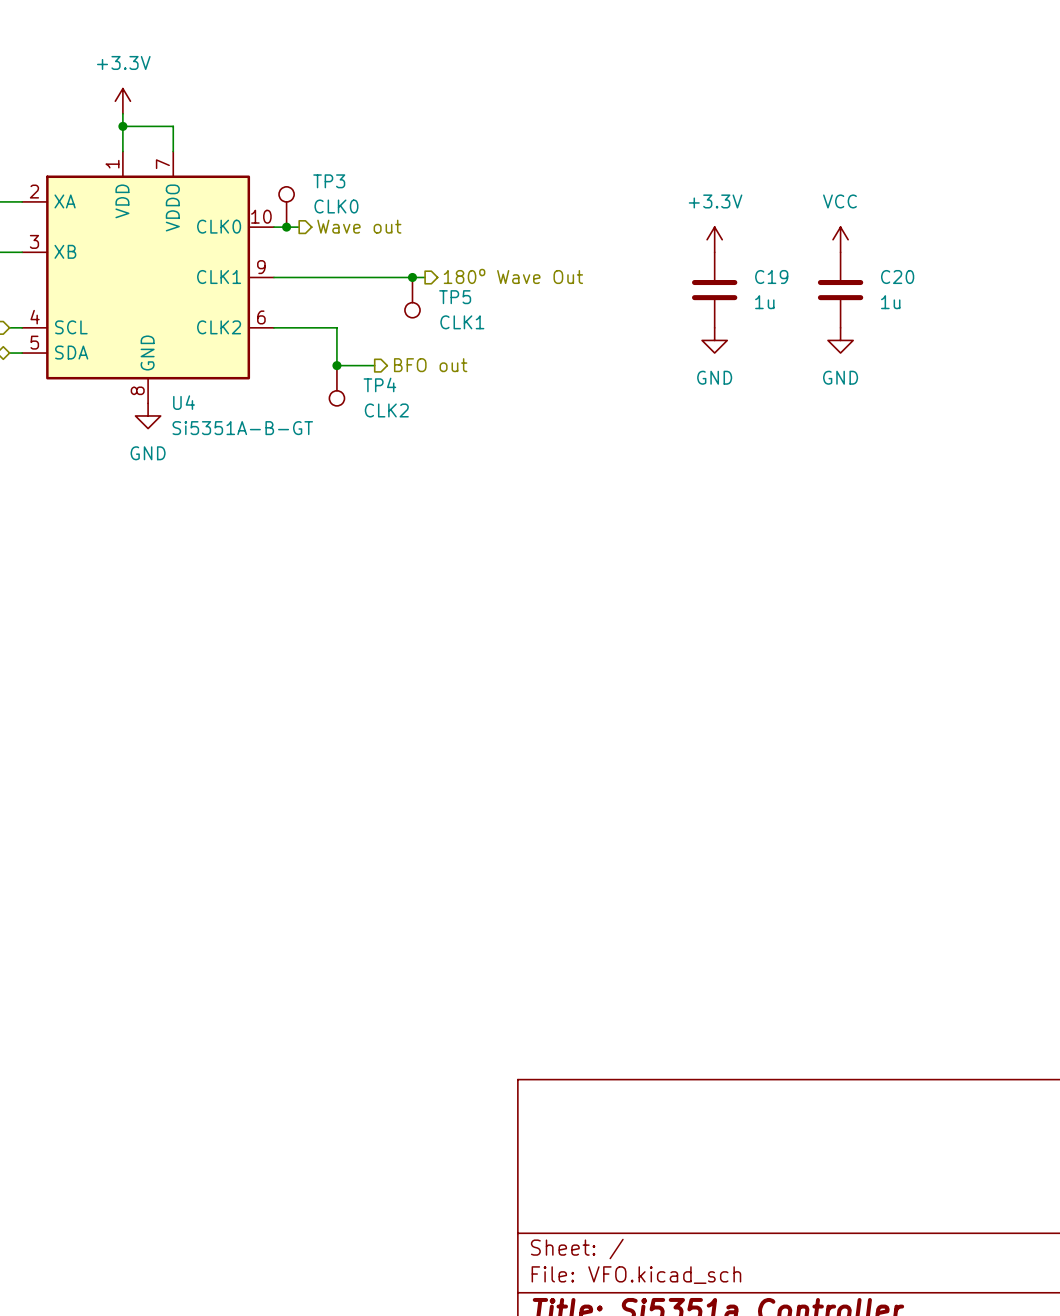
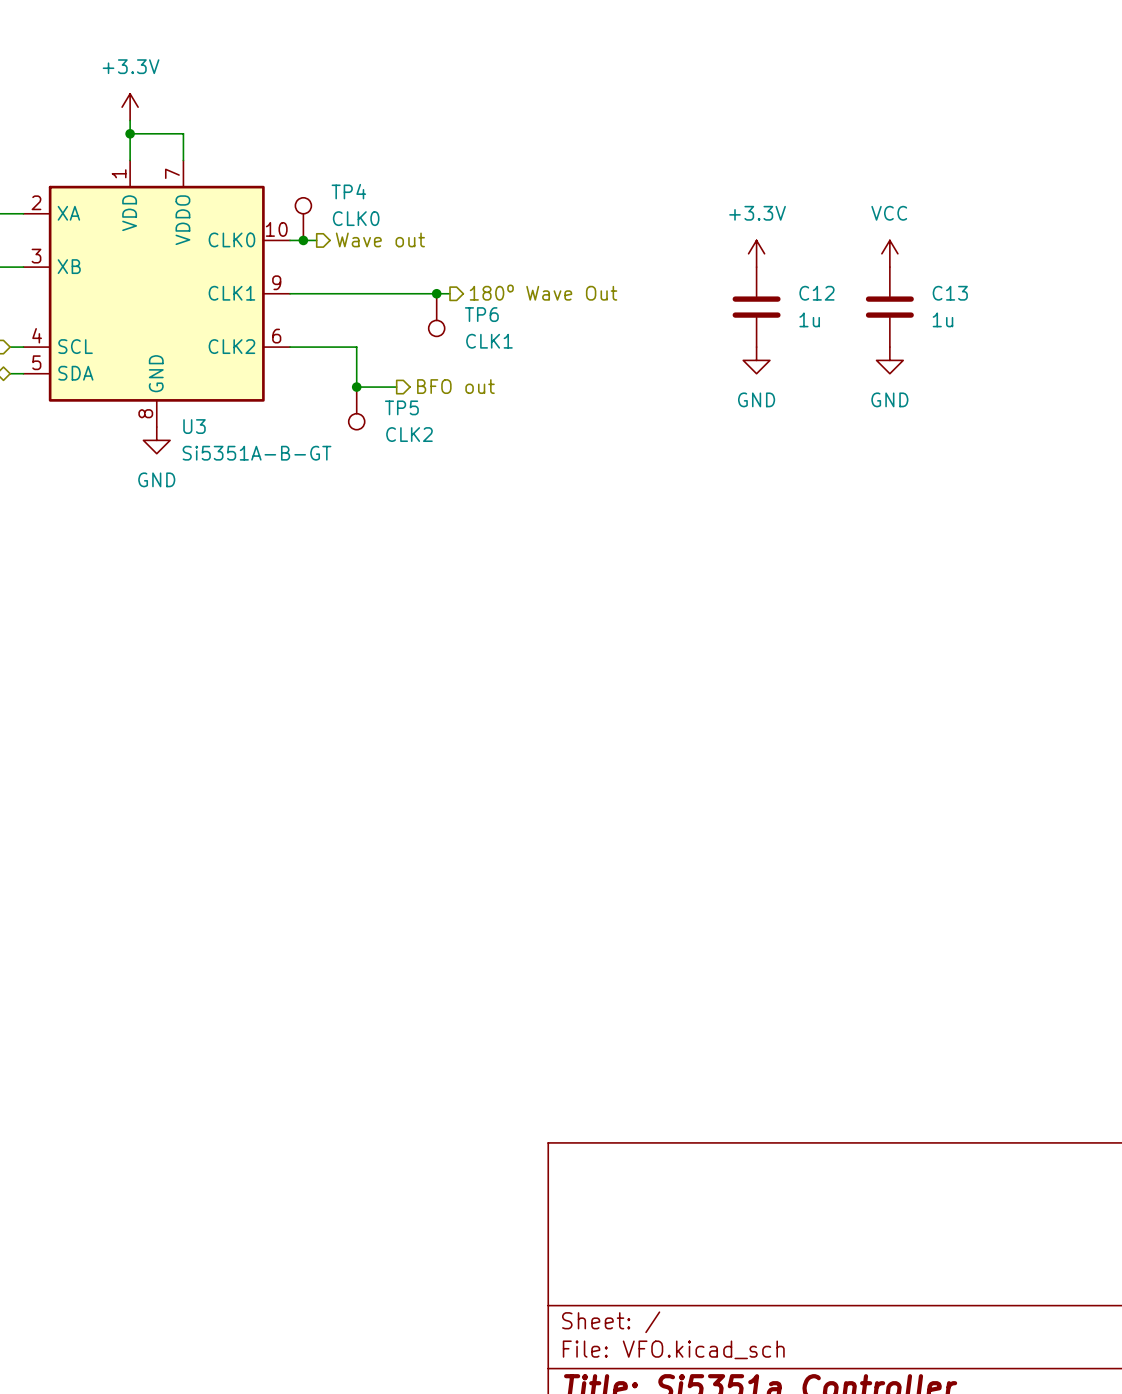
TP3 name: TP3 (329, 181) -> TP4 (348, 191)
C19 name: C19 (771, 277) -> C12 (816, 293)
C20 name: C20 (897, 277) -> C13 (950, 293)
TP5 name: TP5 (455, 297) -> TP6 (481, 314)
TP4 name: TP4 (379, 384) -> TP5 (401, 407)
U4 name: U4 (184, 402) -> U3 (194, 426)

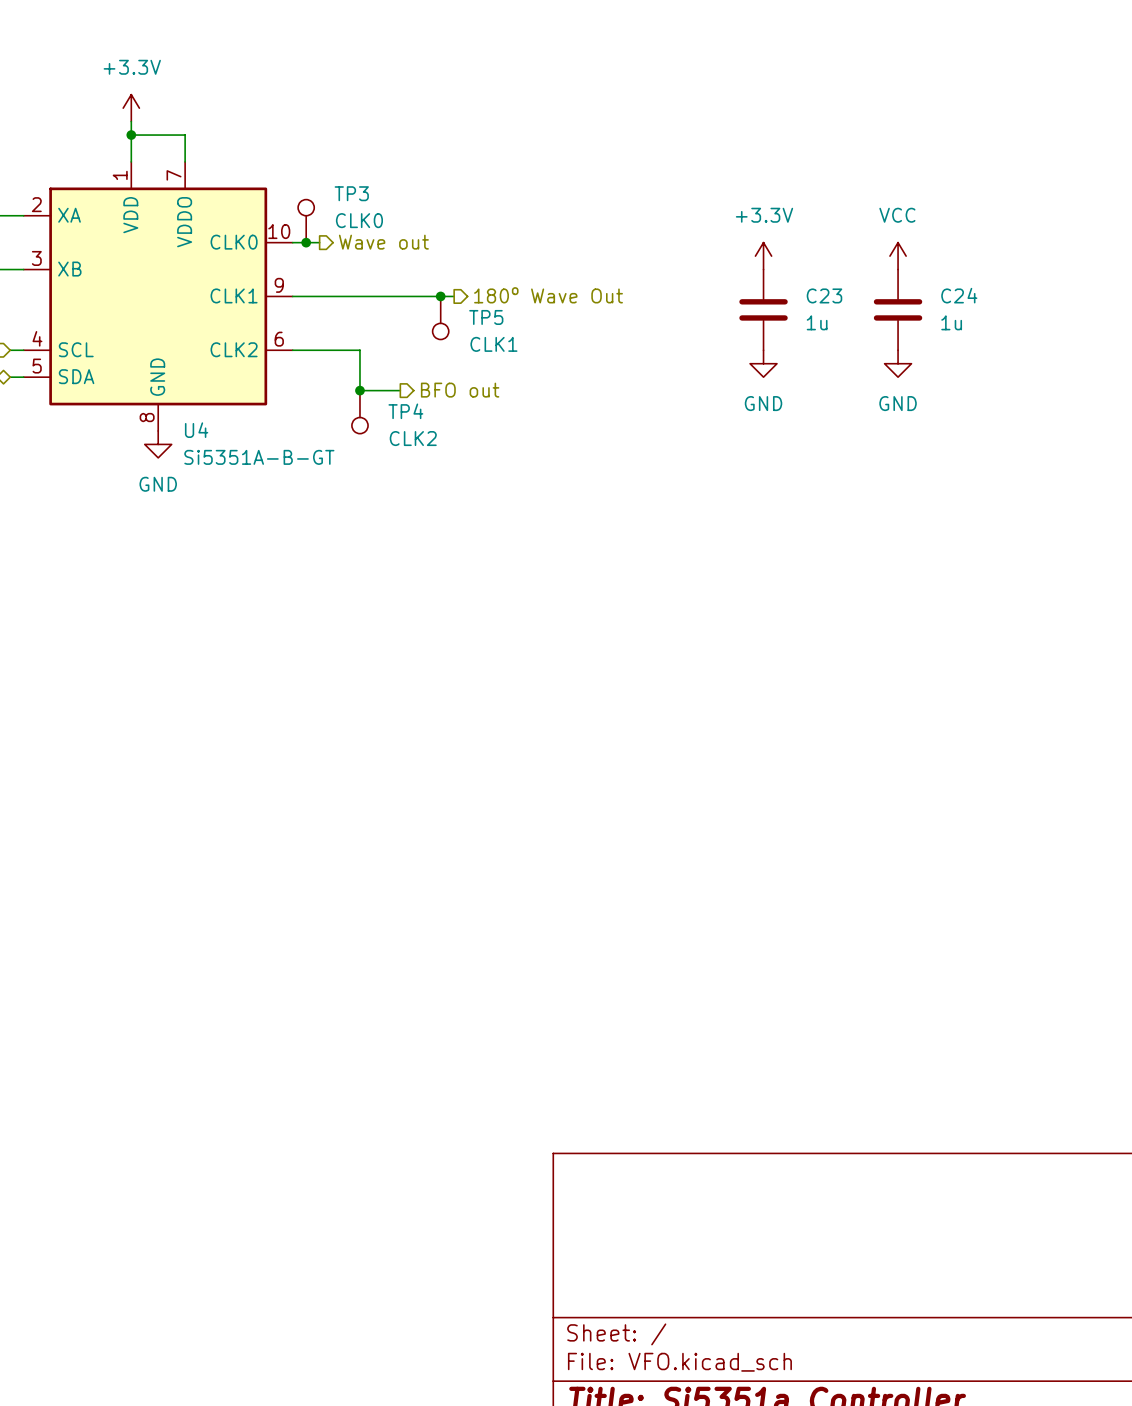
TP4 name: TP4 (348, 191) -> TP3 (351, 193)
C12 name: C12 (816, 293) -> C23 (824, 295)
C13 name: C13 (950, 293) -> C24 (959, 295)
TP6 name: TP6 (481, 314) -> TP5 (486, 317)
TP5 name: TP5 (401, 407) -> TP4 (405, 411)
U3 name: U3 (194, 426) -> U4 (196, 430)

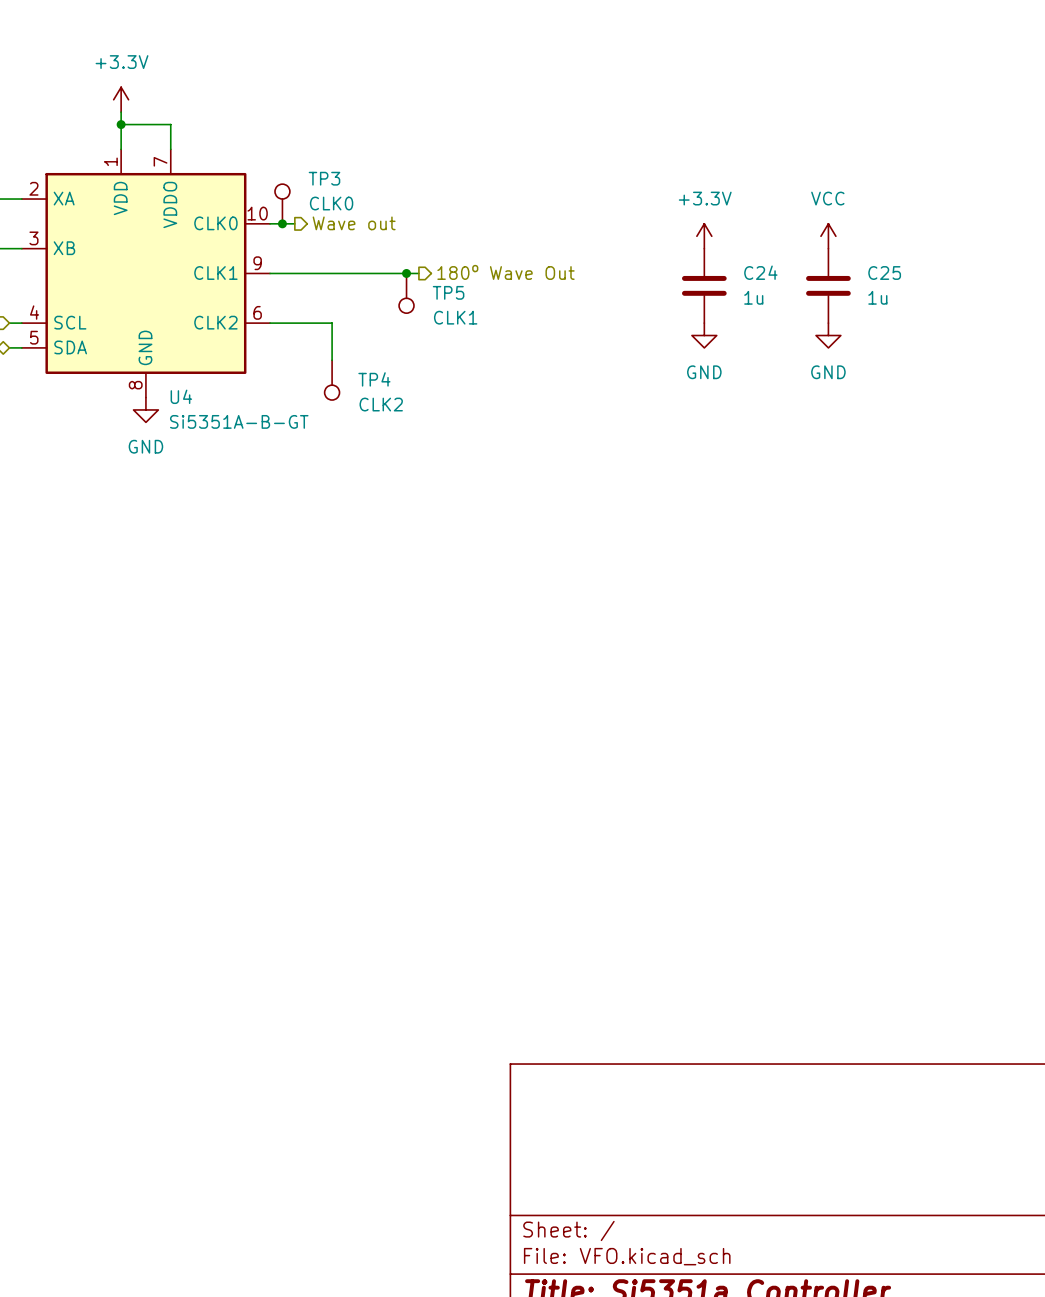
C23 name: C23 (824, 295) -> C24 (760, 272)
C24 name: C24 (959, 295) -> C25 (884, 273)
wire: (359, 390) (400, 390) -> none
junction: (359, 390) -> none
hierarchical label: BFO out (460, 390) -> none

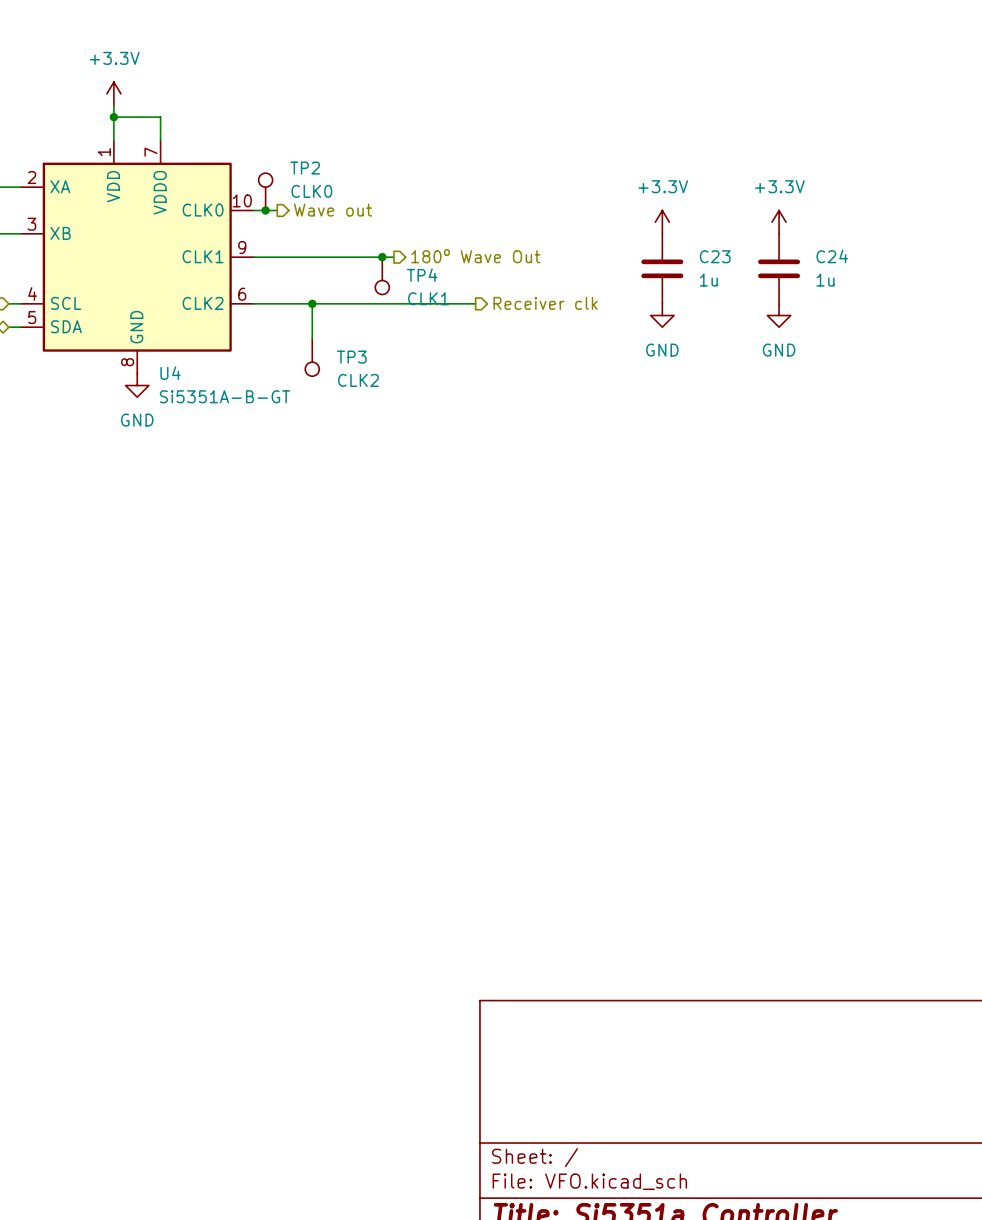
TP3 name: TP3 (324, 178) -> TP2 (305, 168)
power symbol: VCC (828, 236) -> +3.3V (779, 222)
C24 name: C24 (760, 272) -> C23 (715, 256)
C25 name: C25 (884, 273) -> C24 (832, 256)
TP5 name: TP5 (448, 292) -> TP4 (422, 275)
hierarchical label: none -> Receiver clk (545, 303)
wire: none -> (312, 303) (475, 303)
junction: none -> (312, 303)
TP4 name: TP4 (374, 379) -> TP3 (351, 357)

